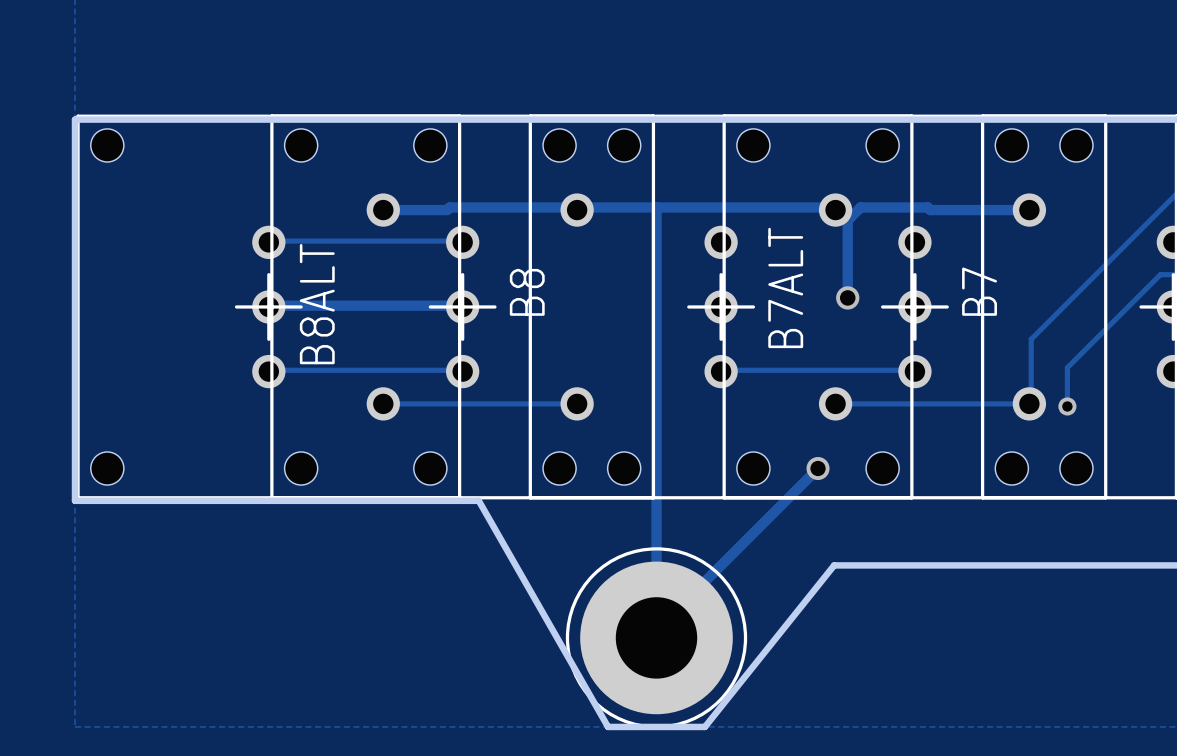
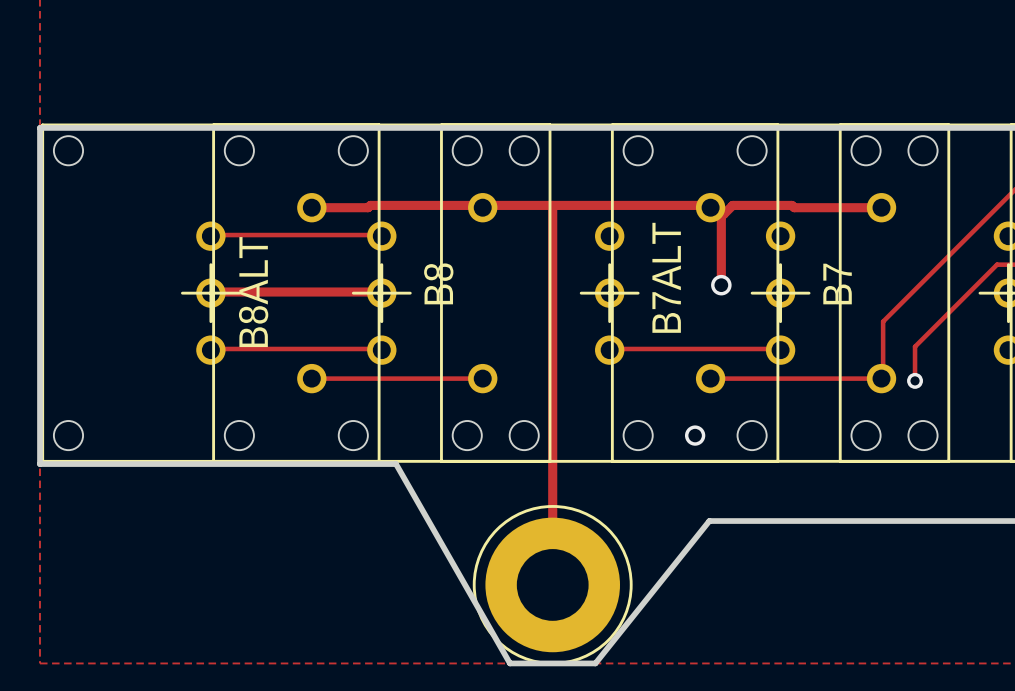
track: (818, 468) (660, 625) (656, 637) -> none

